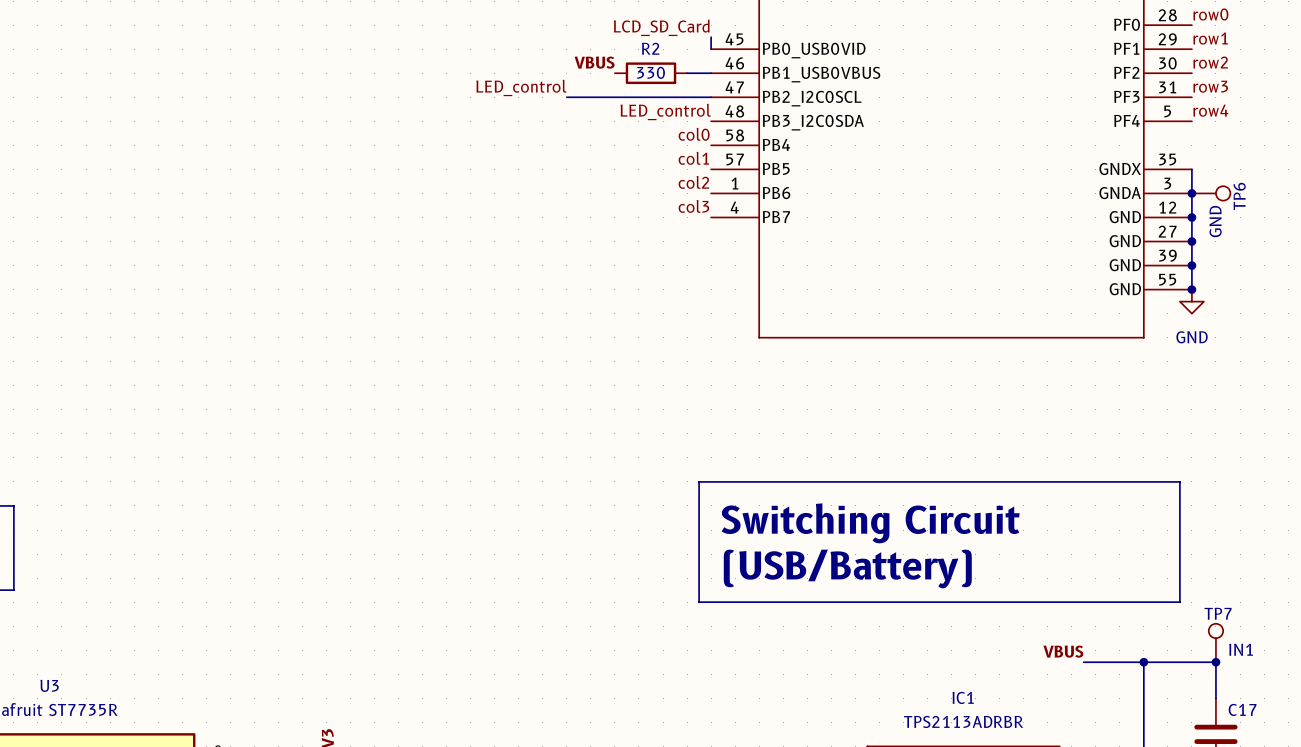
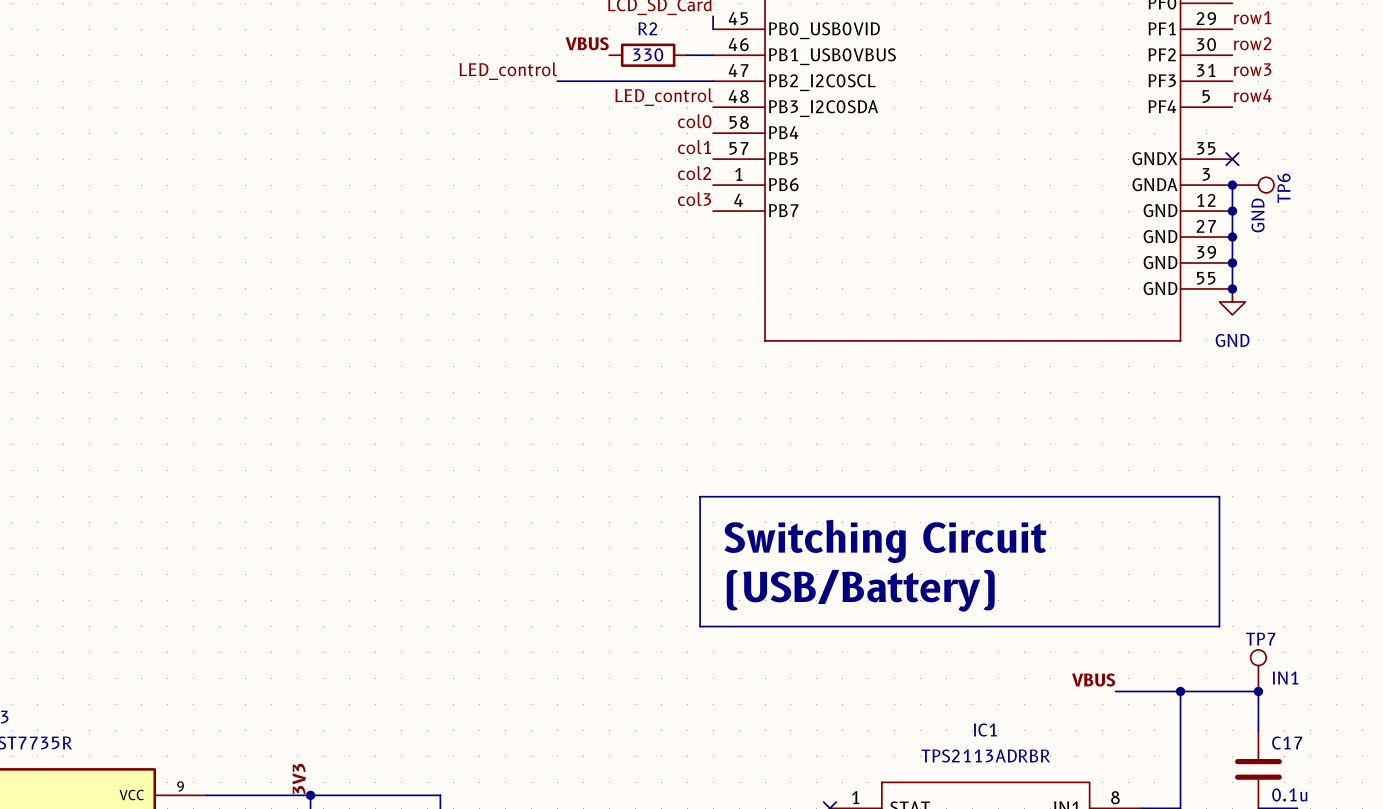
wire: (1191, 169) (1191, 193) -> none
no-connect mark: none -> (1232, 159)

